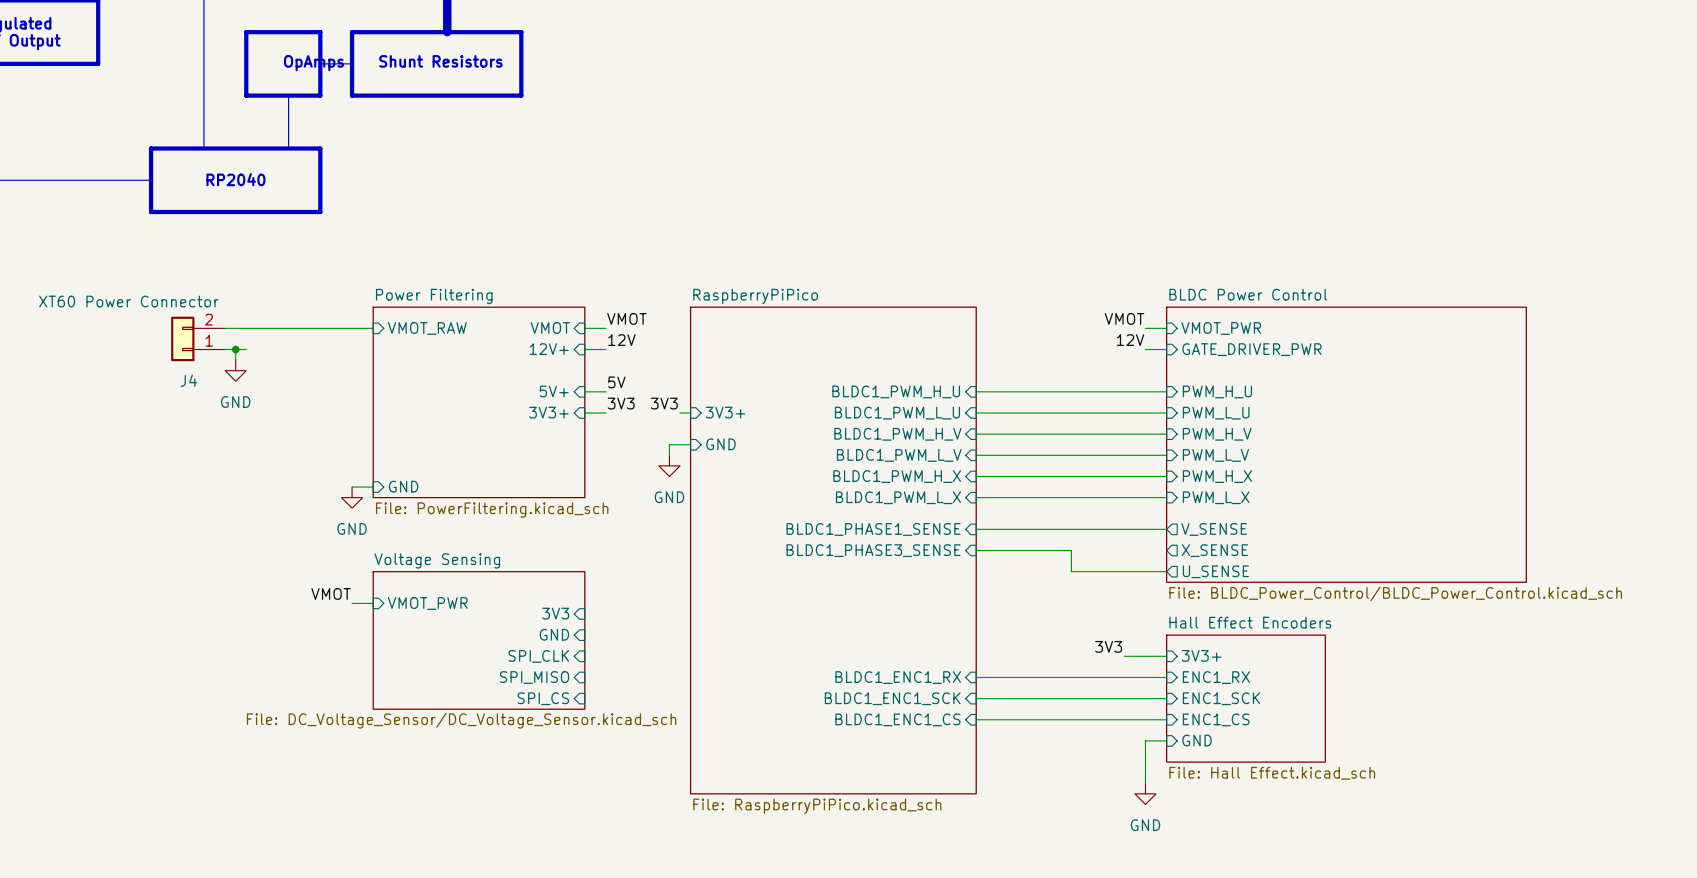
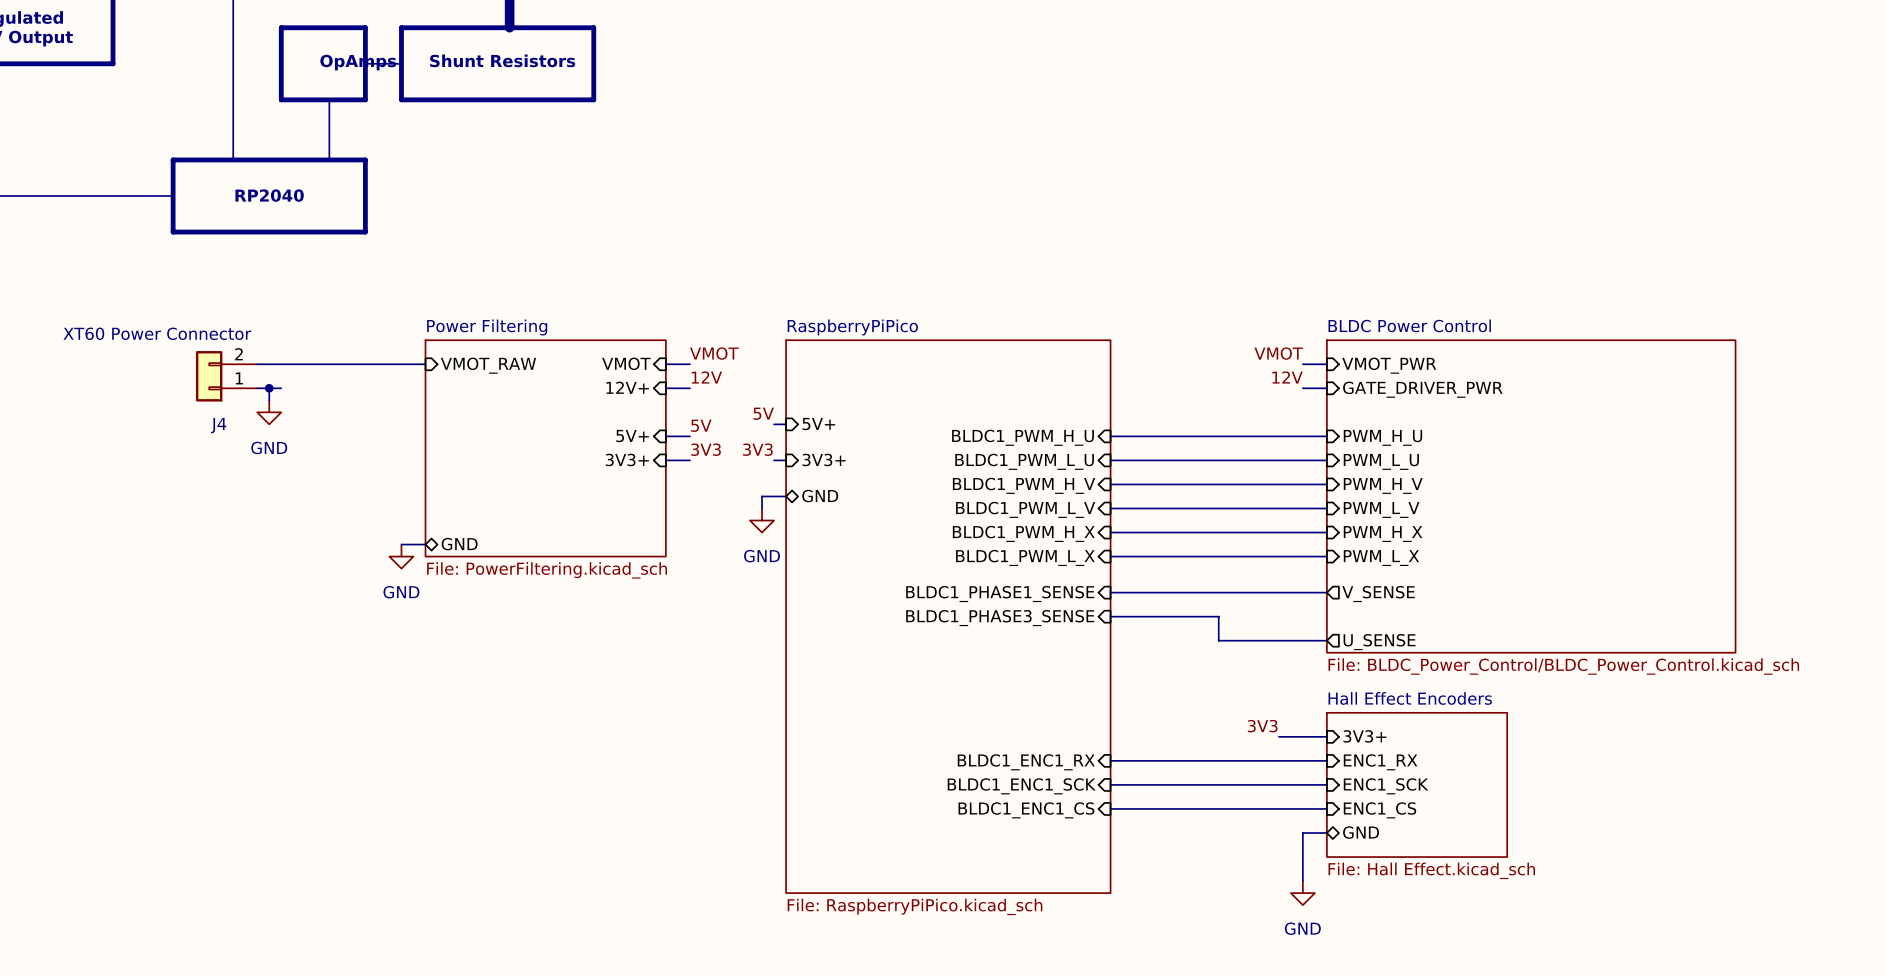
label: none -> 5V (763, 413)
sheet pin: none -> 5V+ (818, 424)
wire: none -> (774, 424) (786, 424)
sheet pin shape: input (720, 444) -> bidirectional (820, 496)
sheet pin shape: input (403, 486) -> bidirectional (459, 544)
sheet pin: X_SENSE (1214, 550) -> none
label: VMOT (331, 593) -> none
wire: (352, 603) (373, 603) -> none
sheet pin: VMOT_PWR (427, 603) -> none
sheet pin: 3V3 (555, 613) -> none
sheet pin: GND (554, 634) -> none
sheet Voltage Sensing: File: DC_Voltage_Sensor/DC_Voltage_Sensor.kicad_sch (479, 640) -> none
sheet pin: SPI_CLK (538, 656) -> none
sheet pin: SPI_MISO (534, 677) -> none
sheet pin: SPI_CS (543, 698) -> none
sheet pin shape: input (1197, 740) -> bidirectional (1361, 832)

